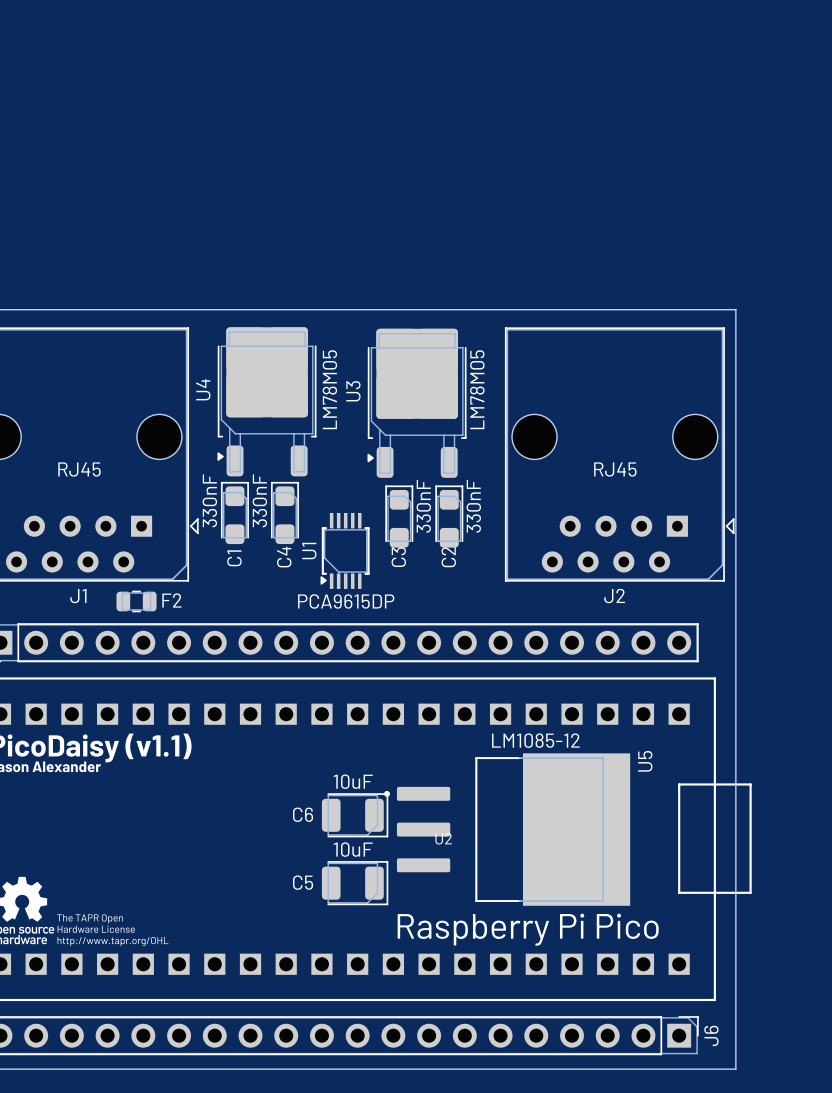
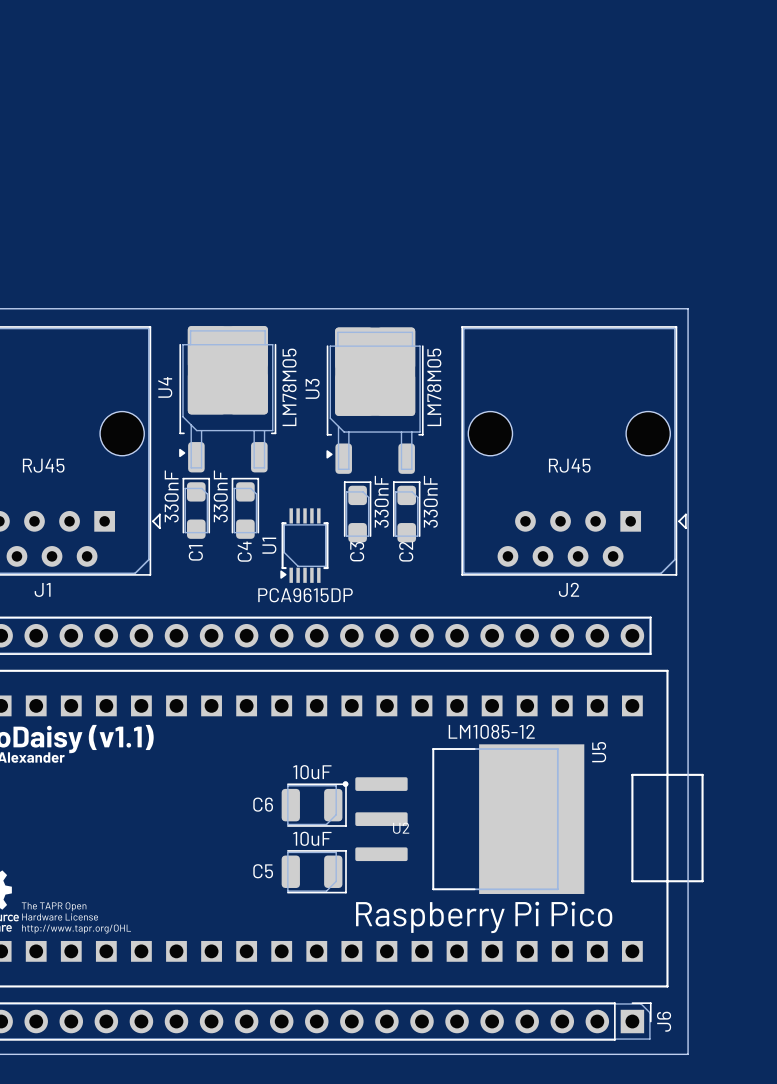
F2: (136, 601) -> none

